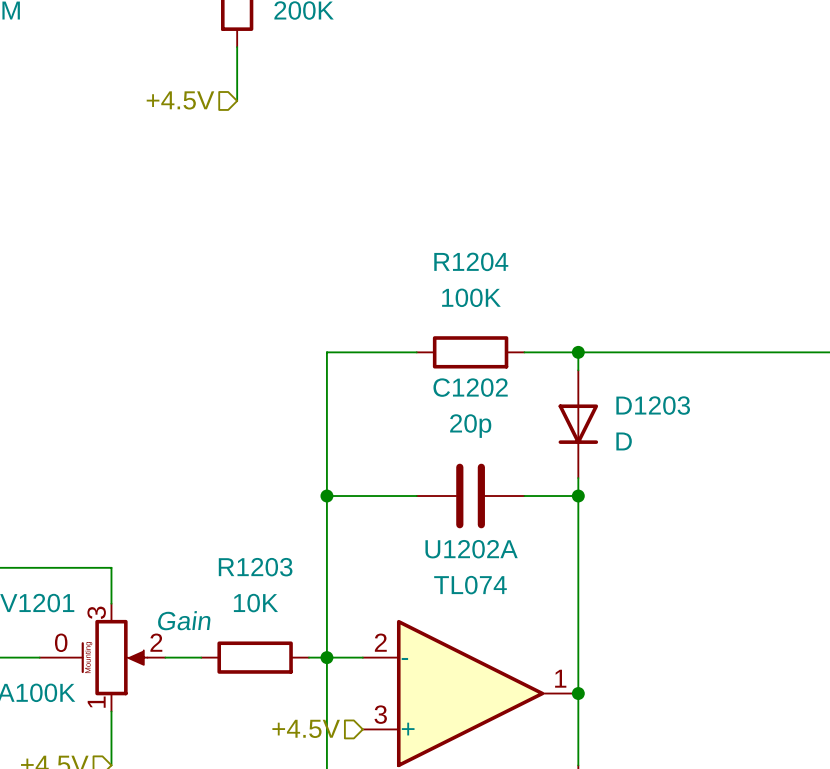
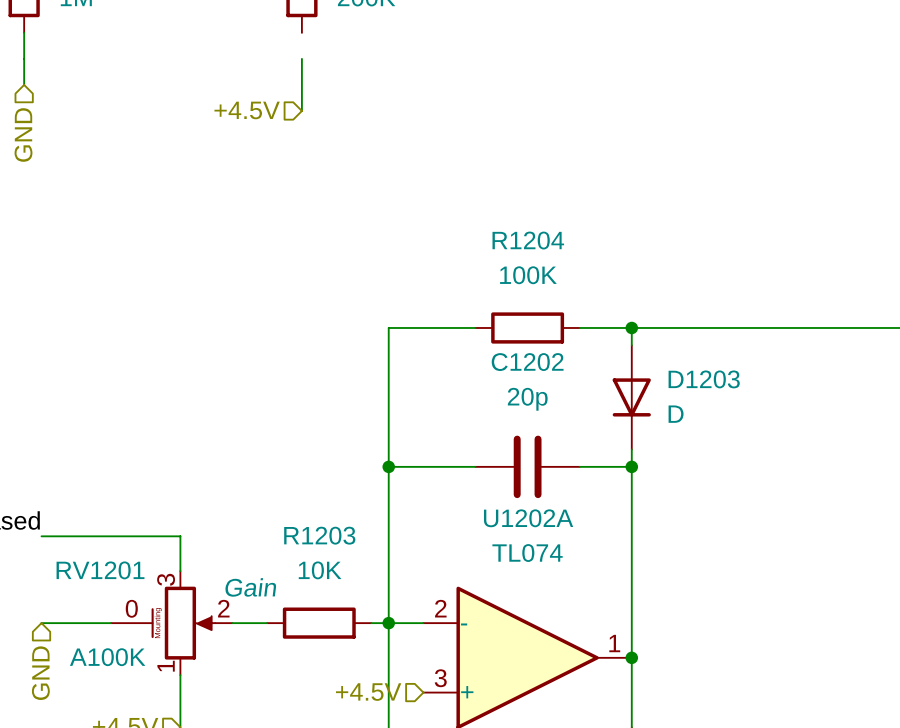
wire: (237, 47) (237, 74) -> (301, 84) (301, 110)
hierarchical label position: +4.5V (180, 100) -> +4.5V (247, 110)

